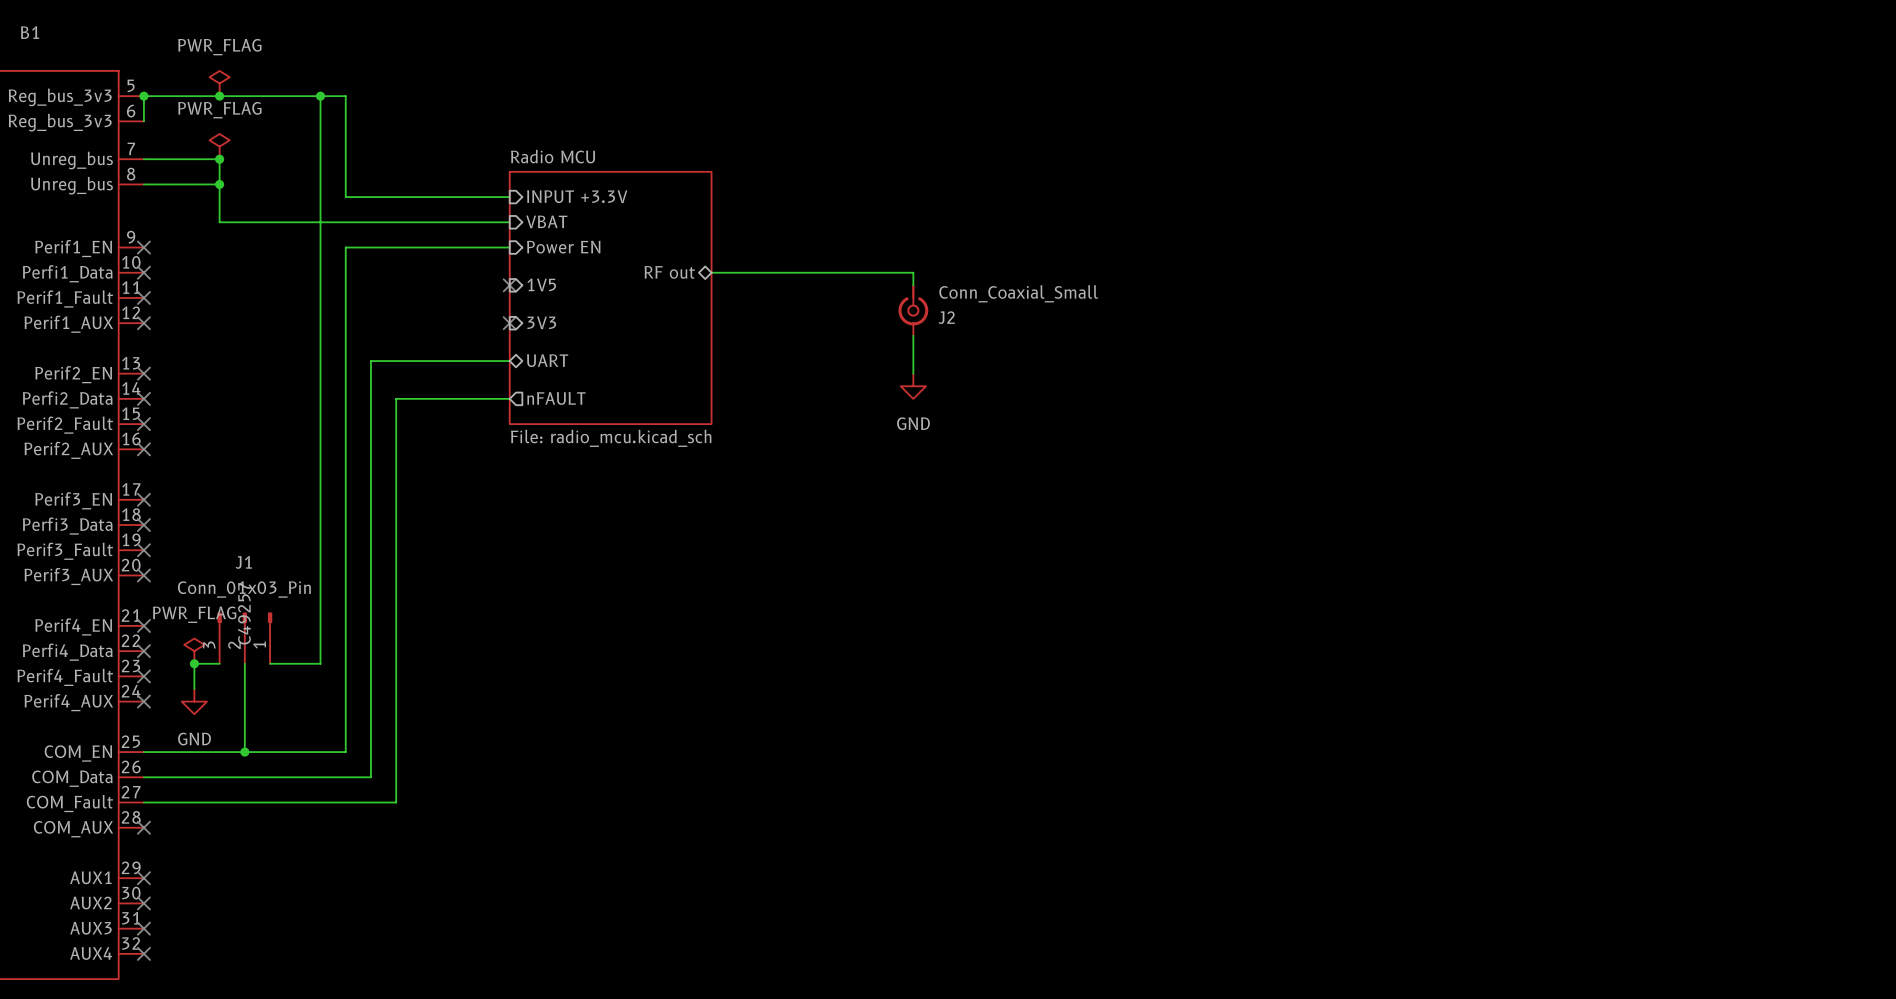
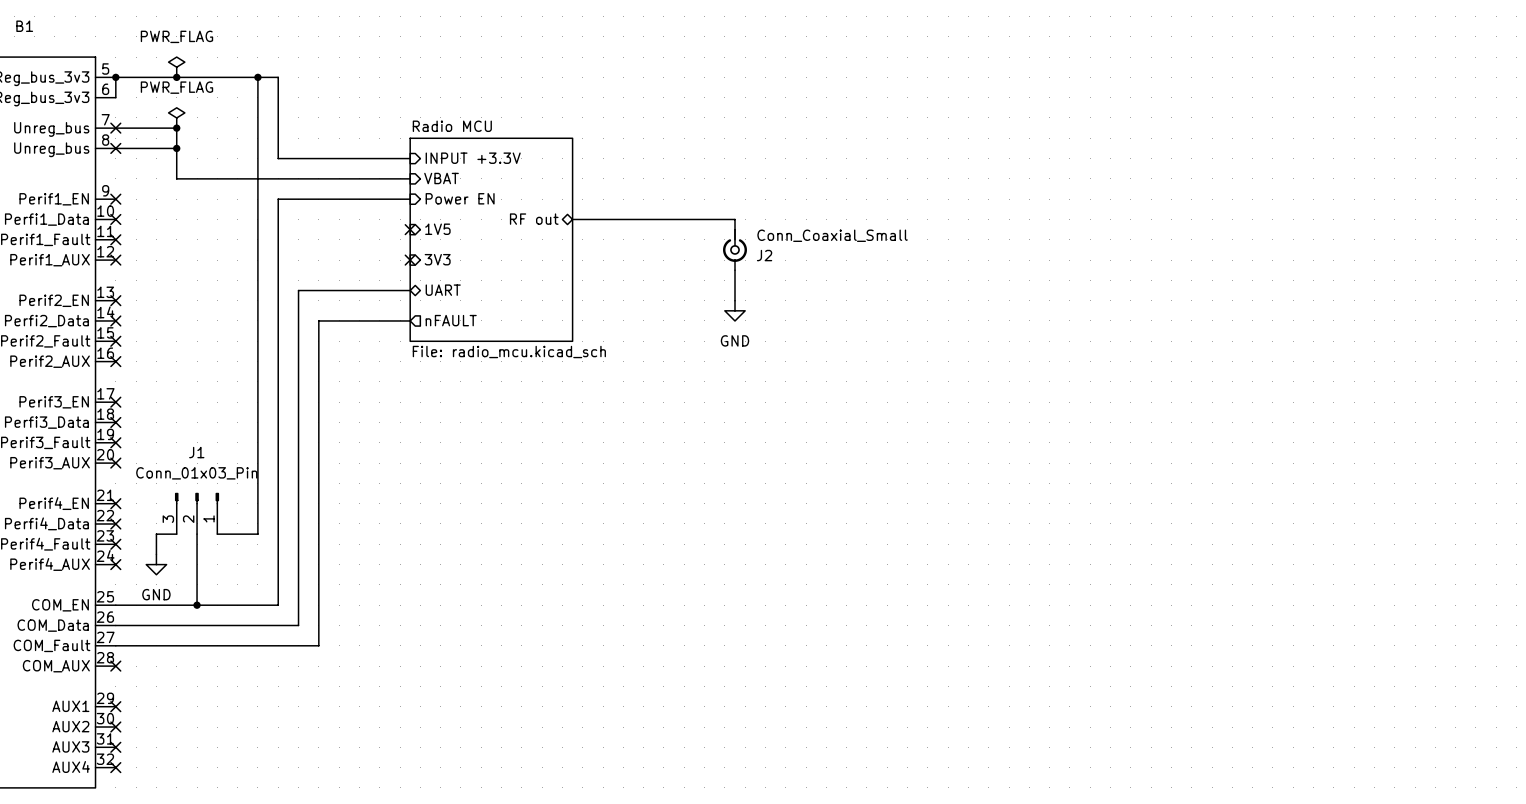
no-connect mark: none -> (115, 128)
no-connect mark: none -> (115, 148)
J1 text: C49257 (244, 613) -> none
power symbol: PWR_FLAG (194, 651) -> none
junction: (194, 663) -> none

